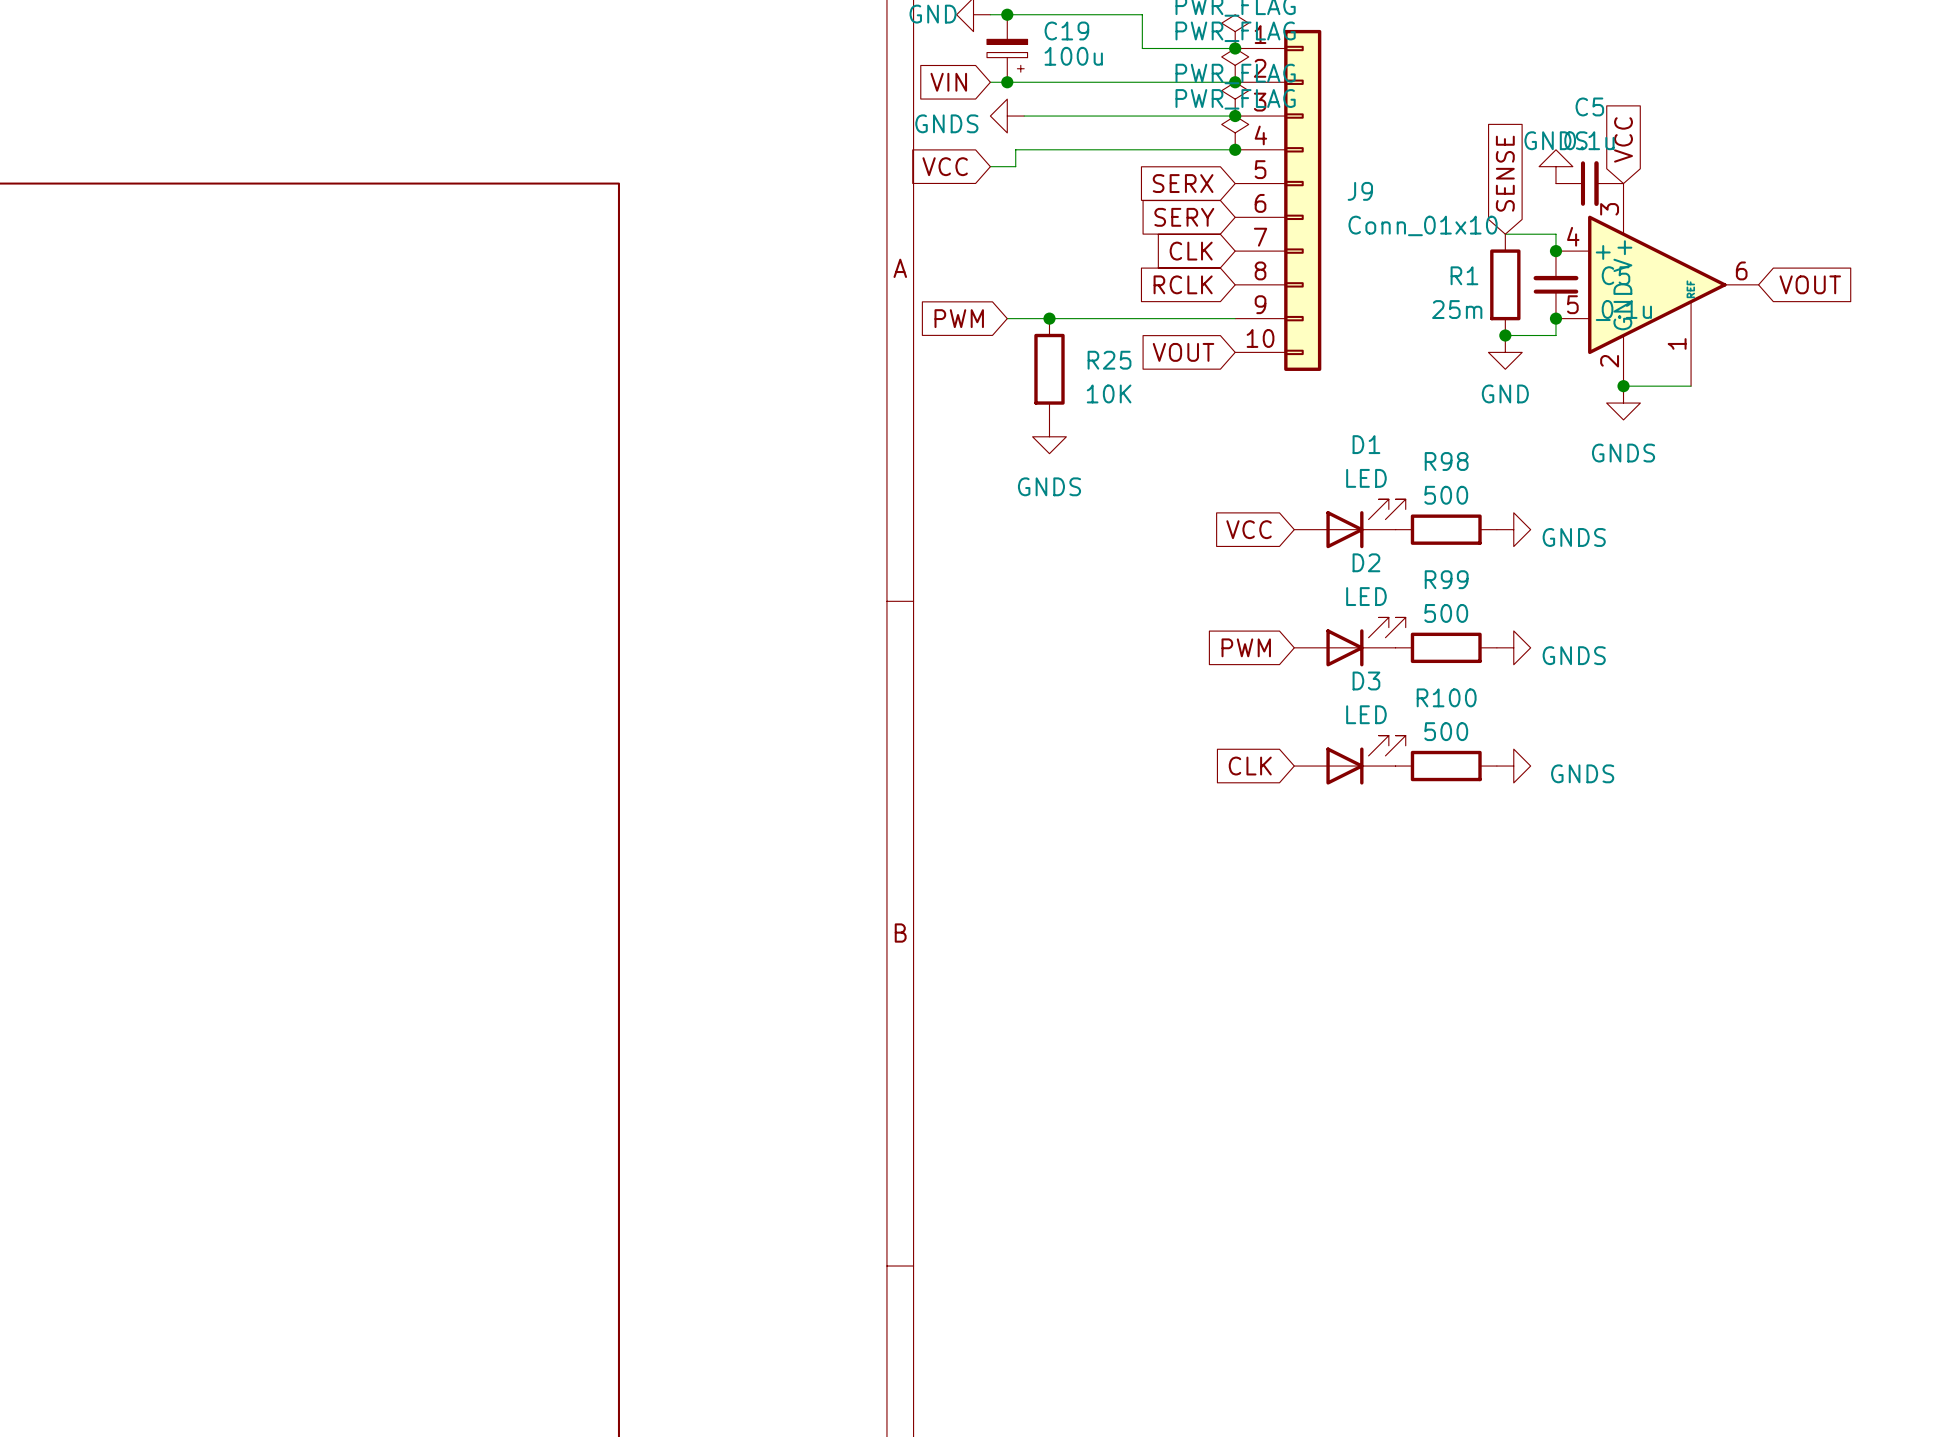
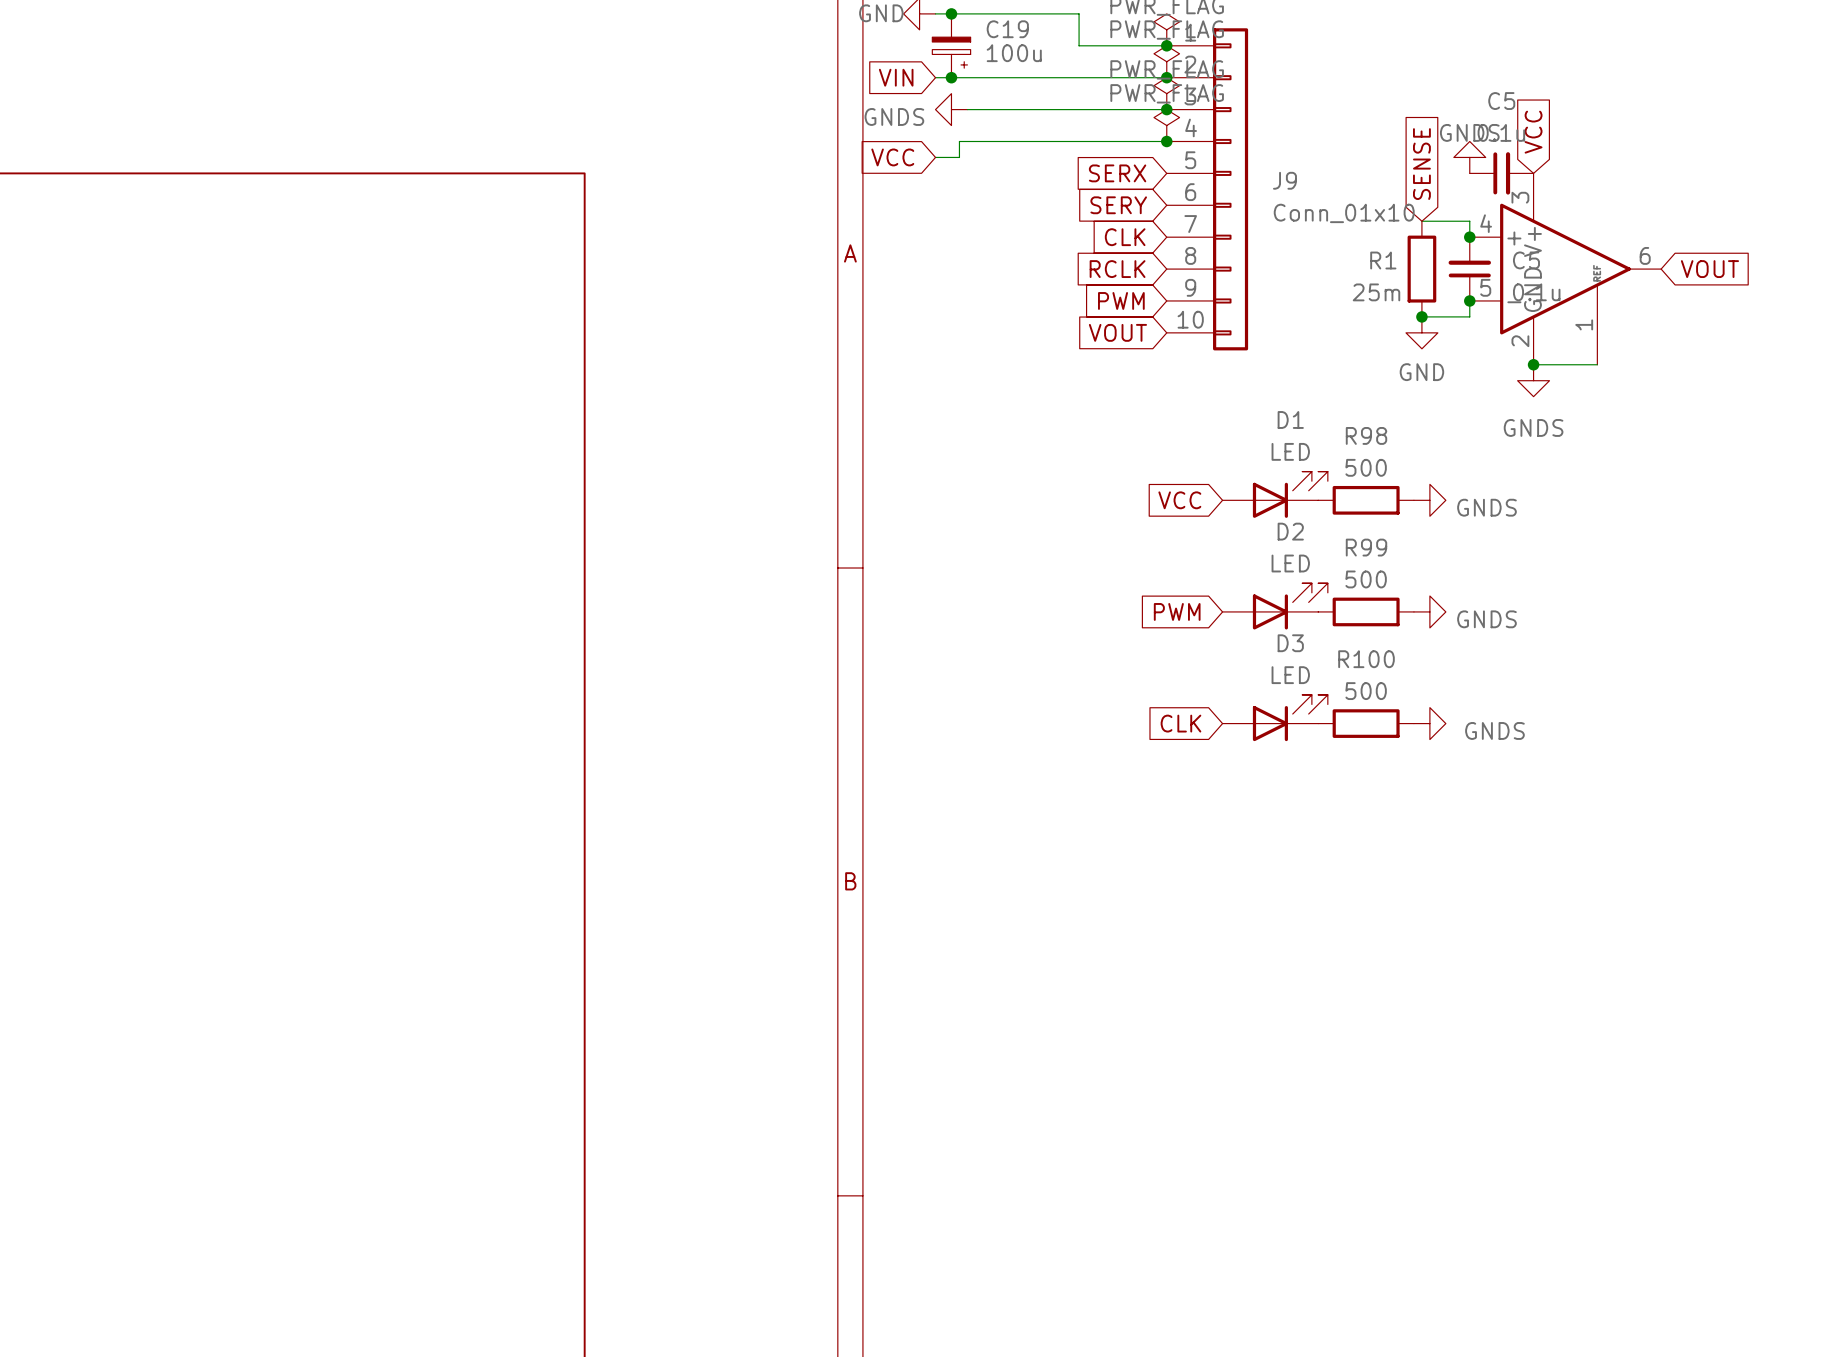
global label position: PWM (959, 318) -> PWM (1121, 300)
wire: (1007, 318) (1235, 318) -> none
junction: (1049, 318) -> none
R25: 10K (1049, 369) -> none
power symbol: GNDS (1049, 436) -> none

